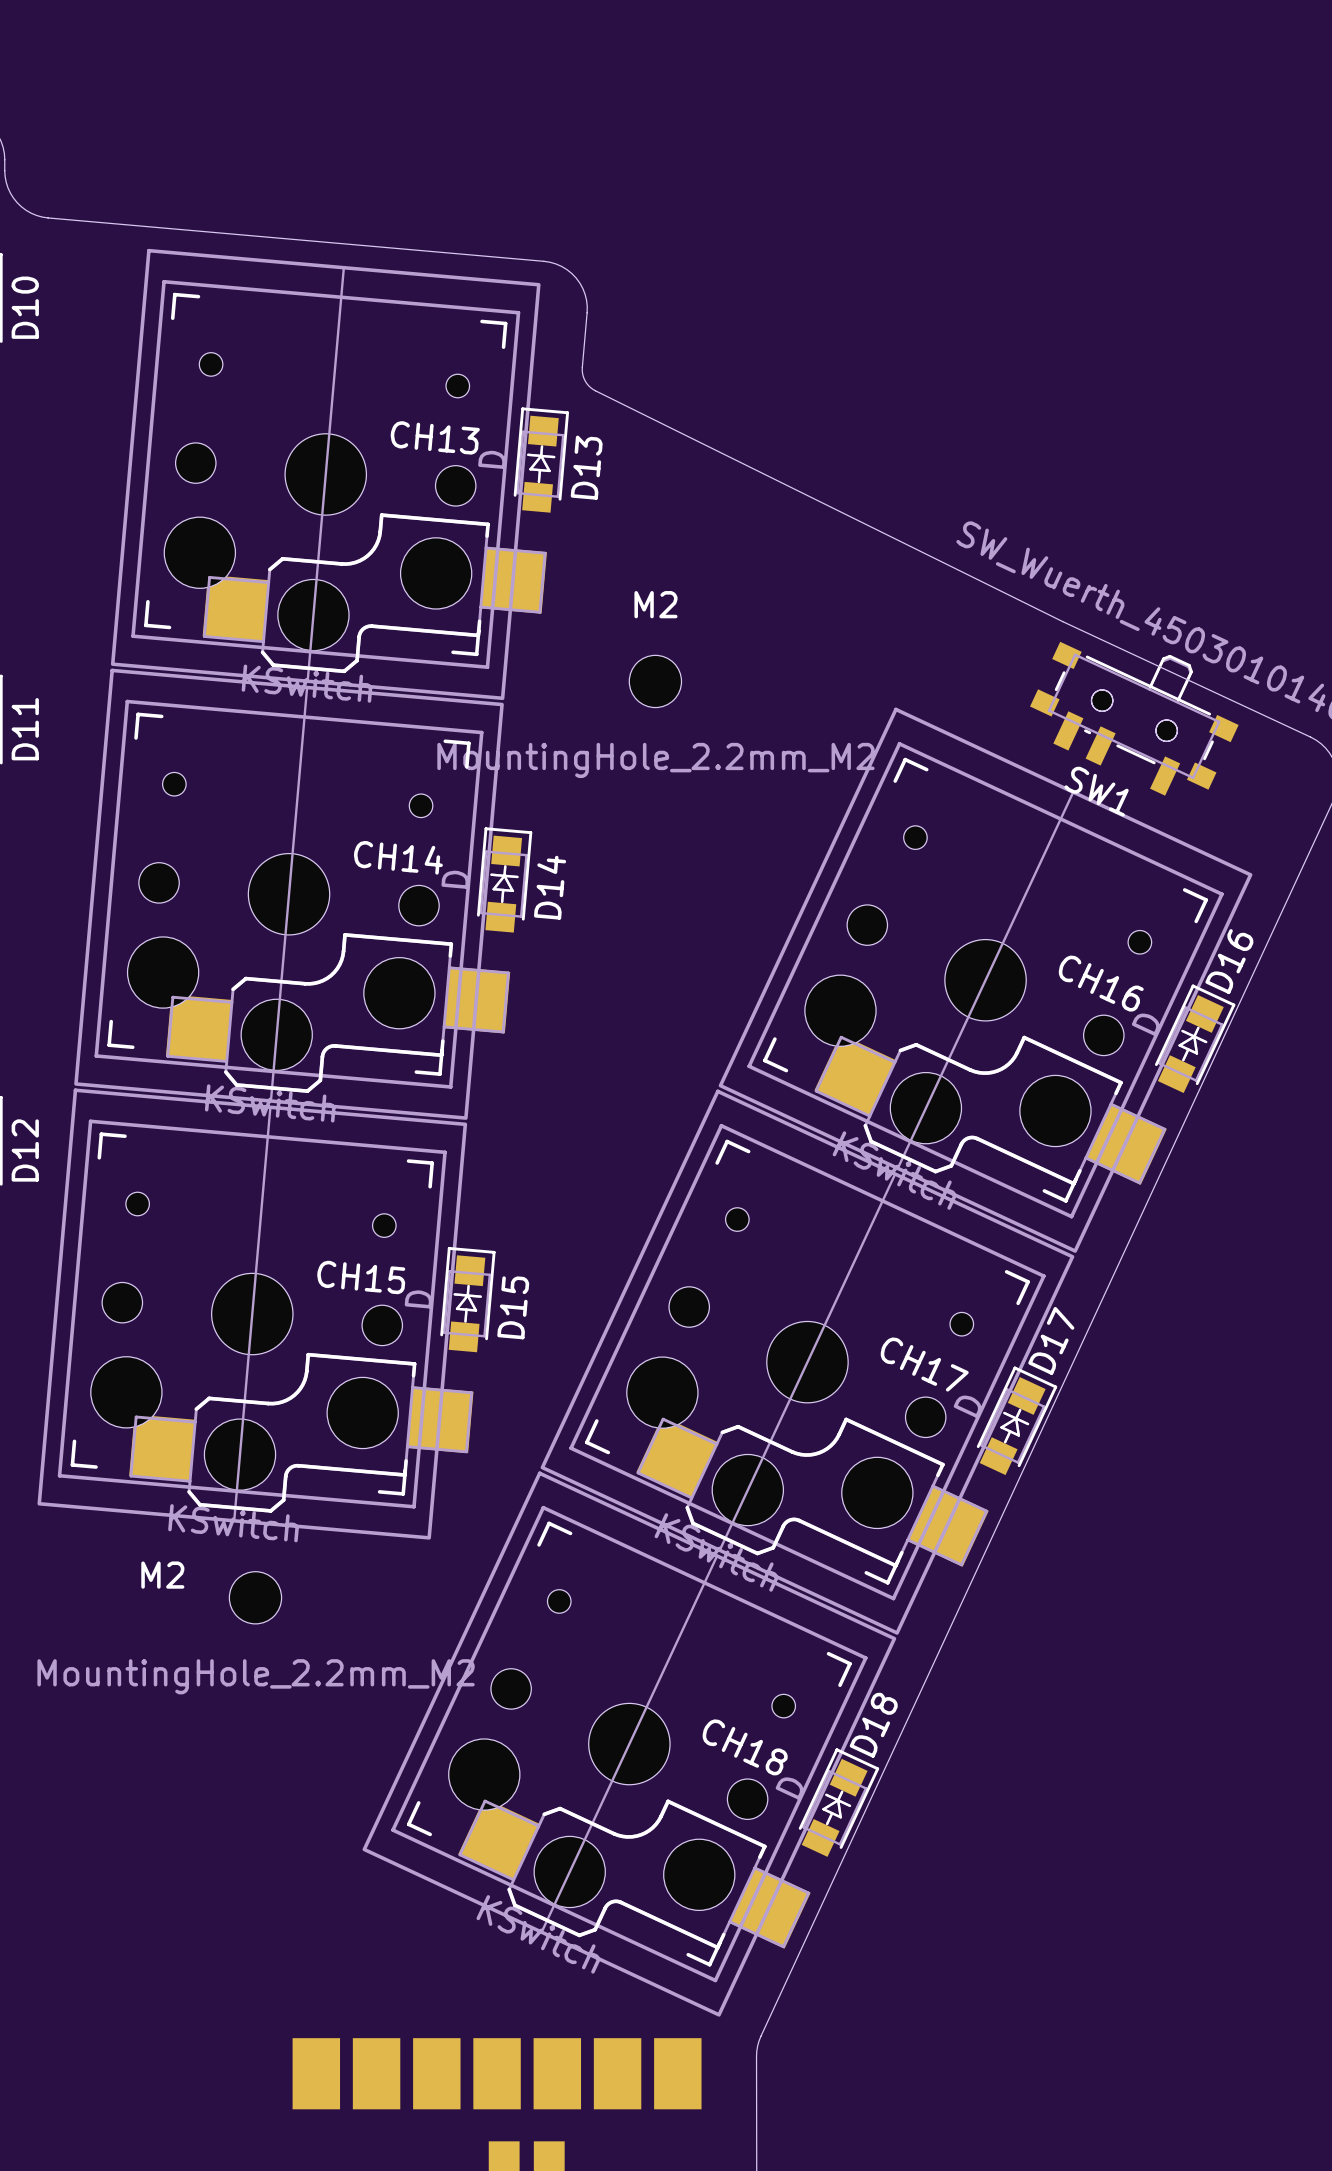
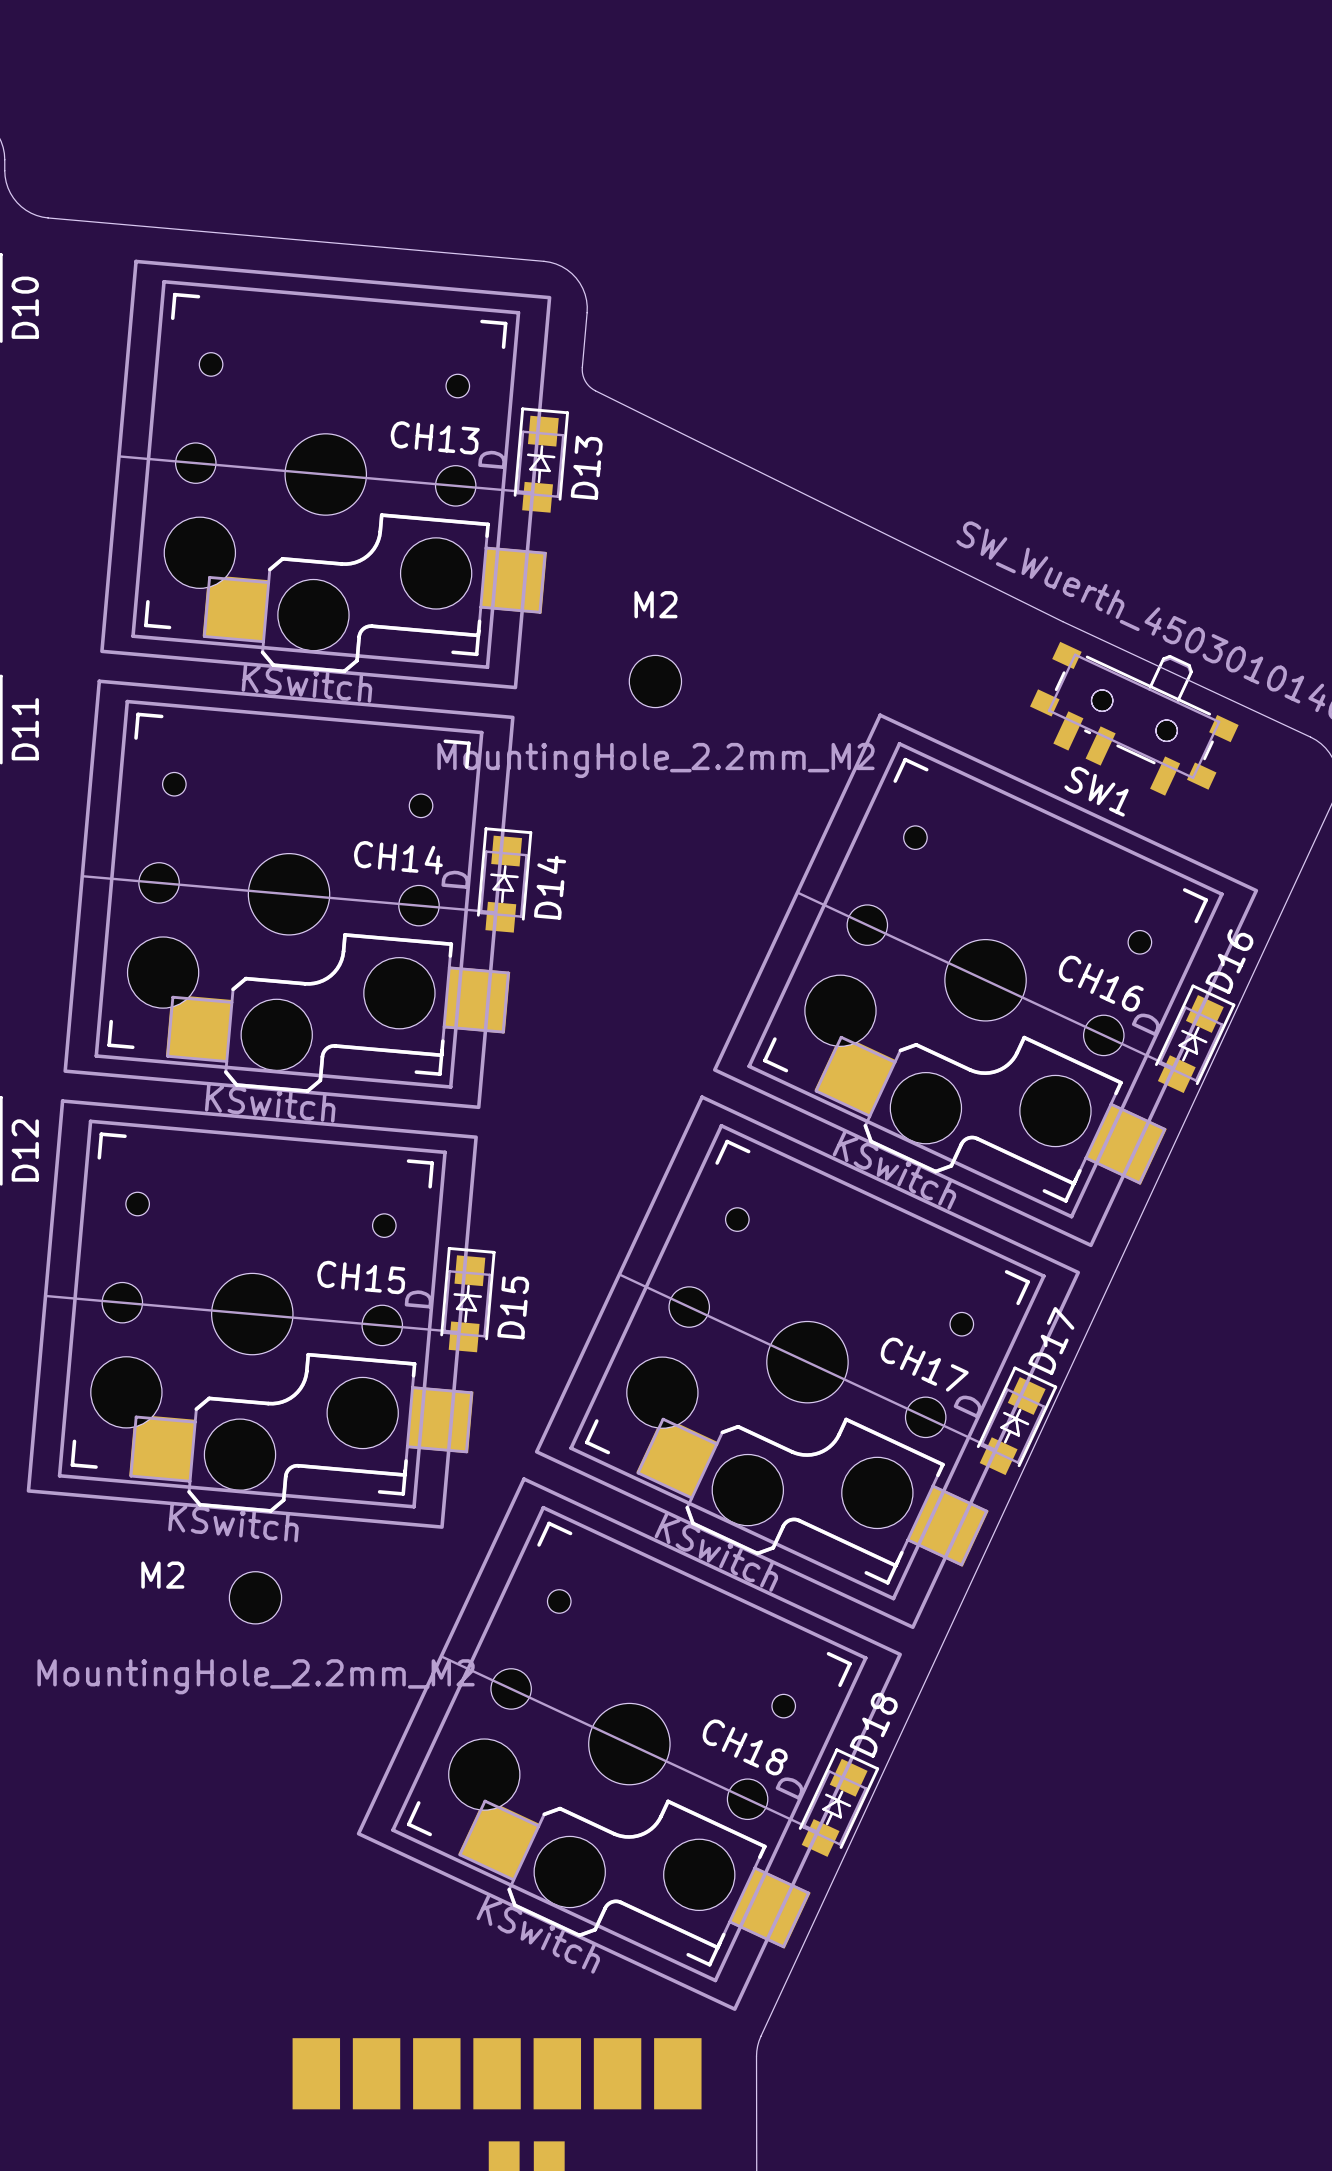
CH13 footprint: [110, 248, 547, 701] -> [100, 259, 552, 690]
CH14 footprint: [74, 668, 511, 1120] -> [63, 679, 515, 1110]
CH16 footprint: [718, 707, 1253, 1253] -> [712, 713, 1259, 1248]
CH15 footprint: [37, 1088, 474, 1540] -> [26, 1099, 478, 1529]
CH17 footprint: [540, 1089, 1075, 1635] -> [534, 1095, 1081, 1630]
CH18 footprint: [362, 1471, 897, 2017] -> [356, 1477, 902, 2011]

